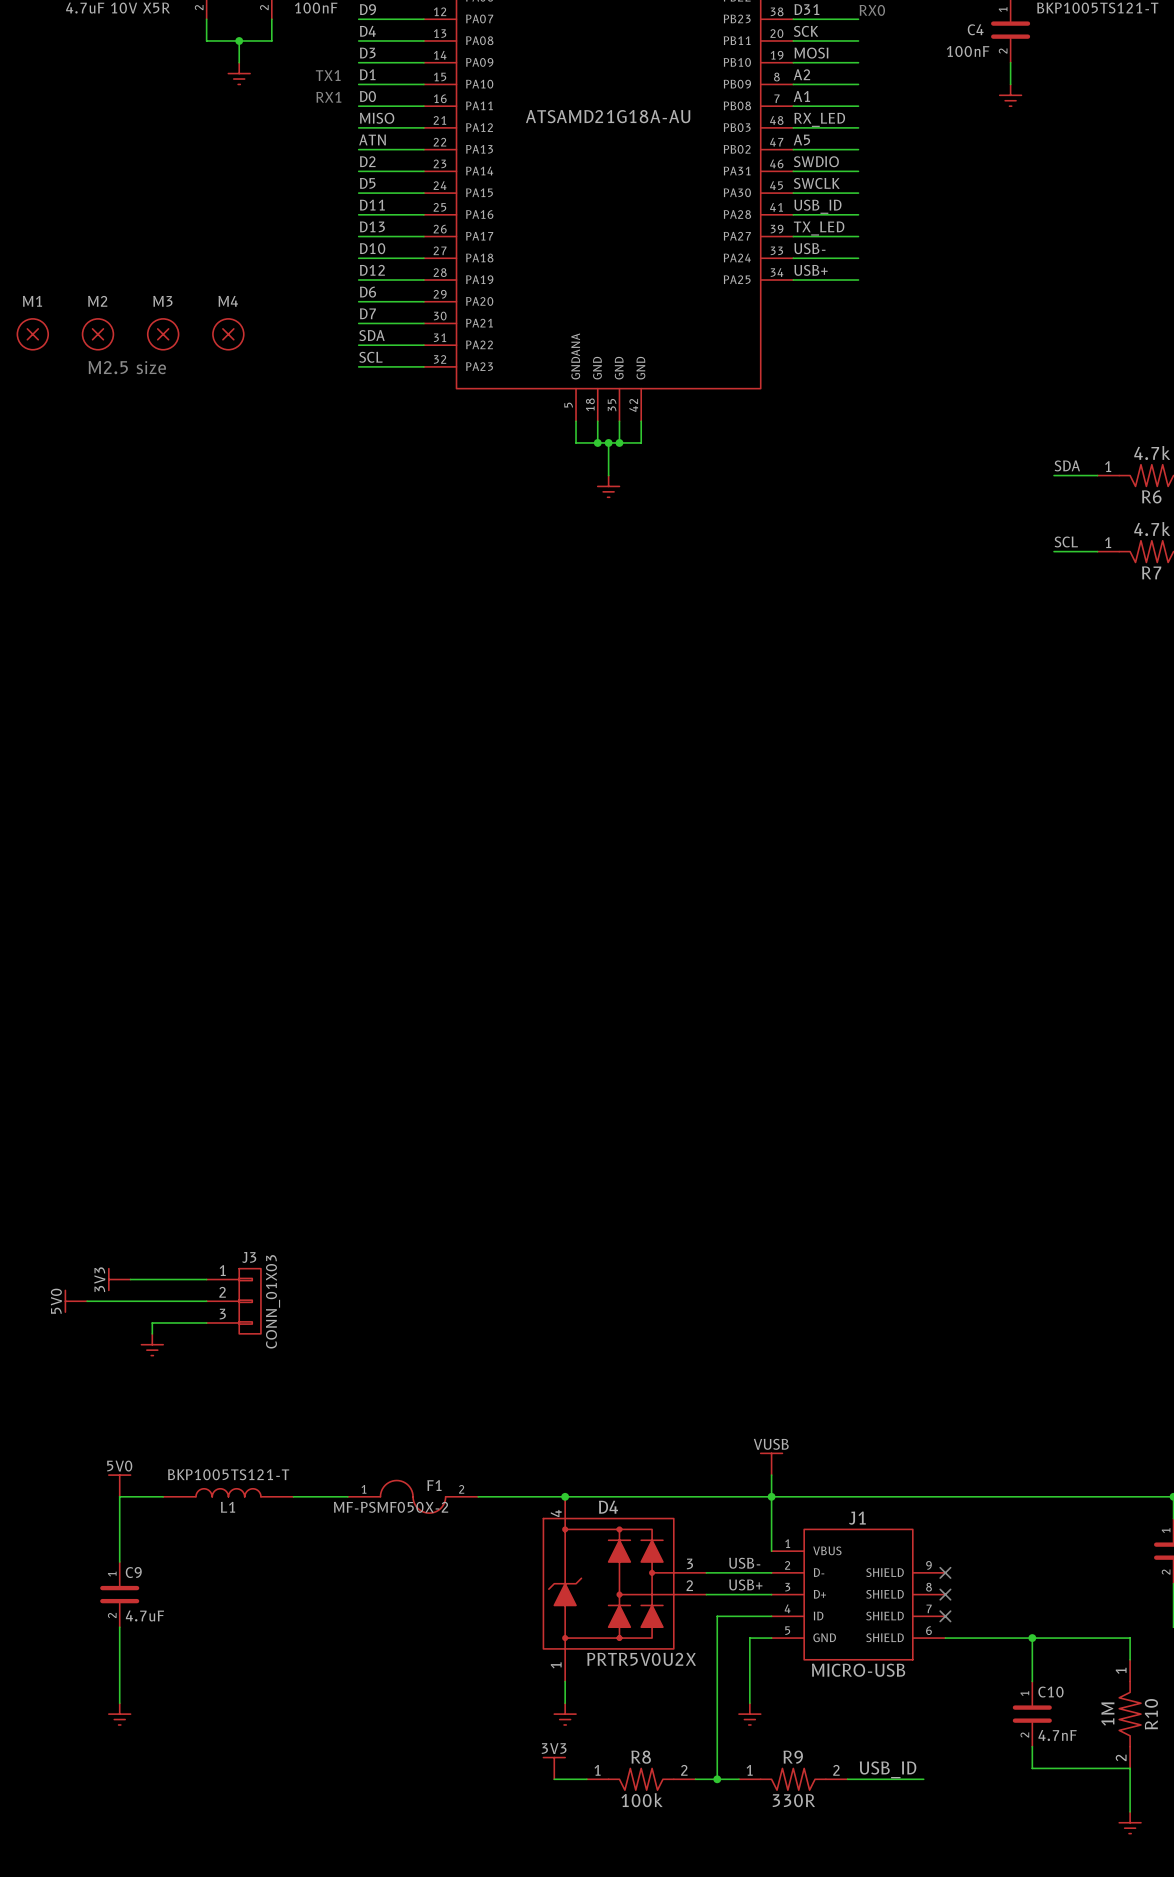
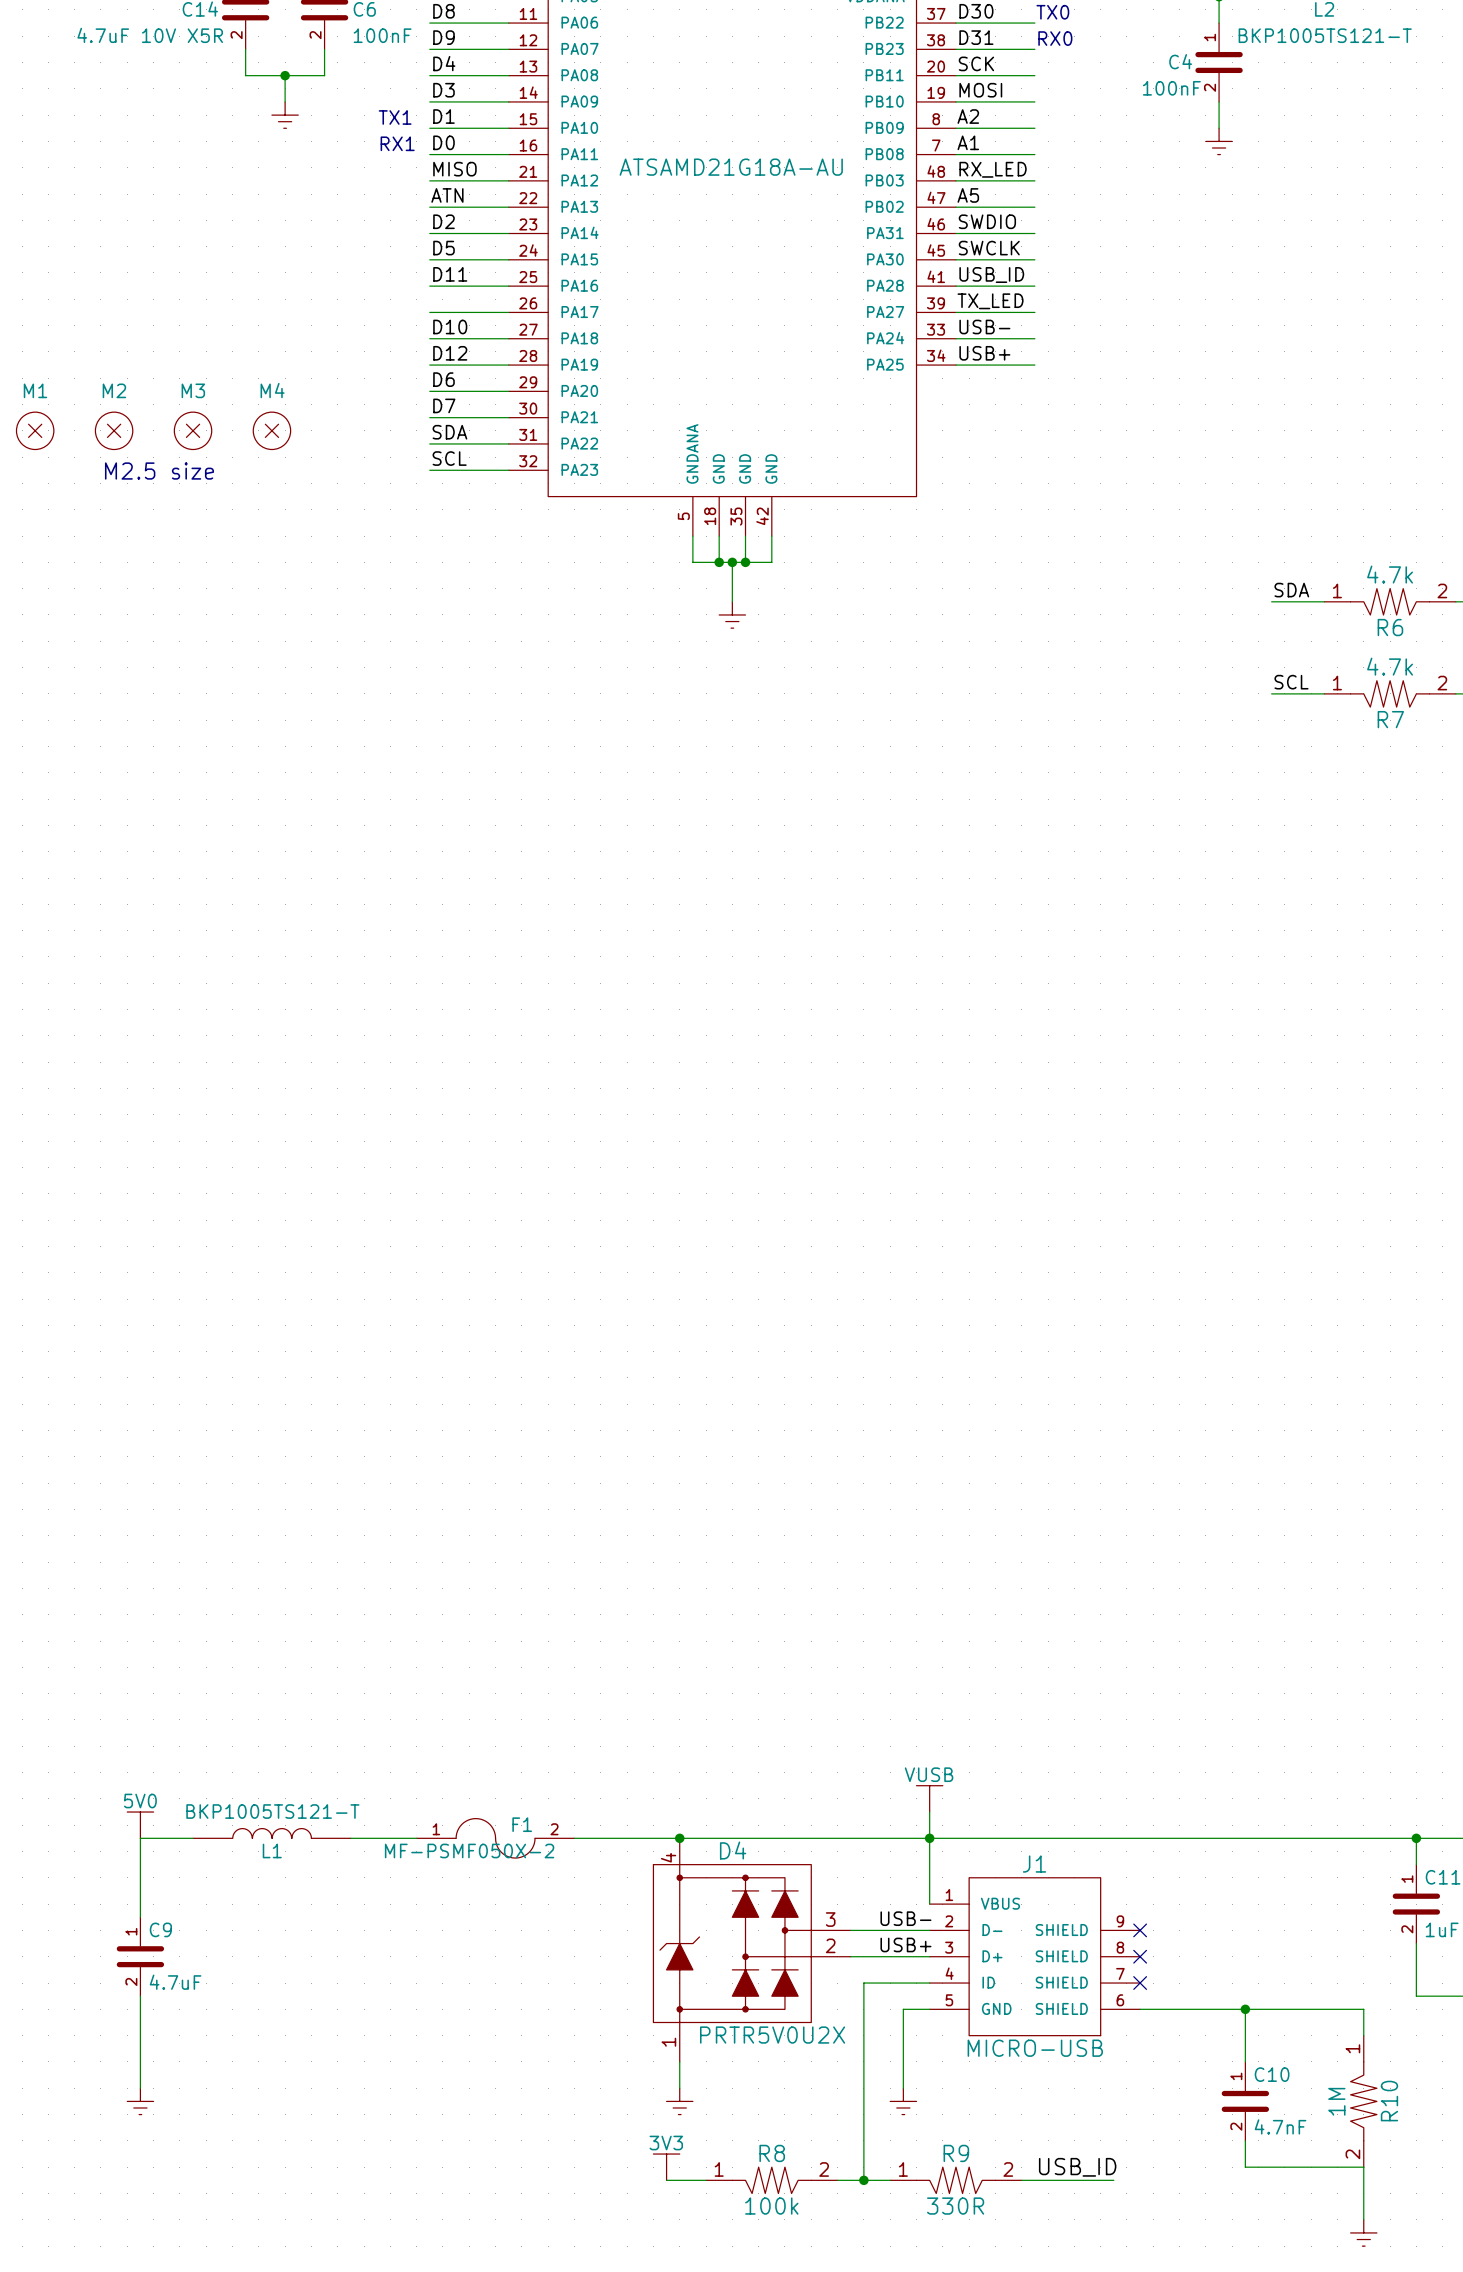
label: D13 (372, 226) -> none
power symbol: 3V3 (119, 1279) -> none
wire: (130, 1279) (206, 1279) -> none
power symbol: 5V0 (76, 1301) -> none
wire: (87, 1301) (206, 1301) -> none
J3: CONN_01X03 (233, 1301) -> none
wire: (206, 1322) (152, 1322) (152, 1333) -> none
power symbol: (152, 1344) -> none

